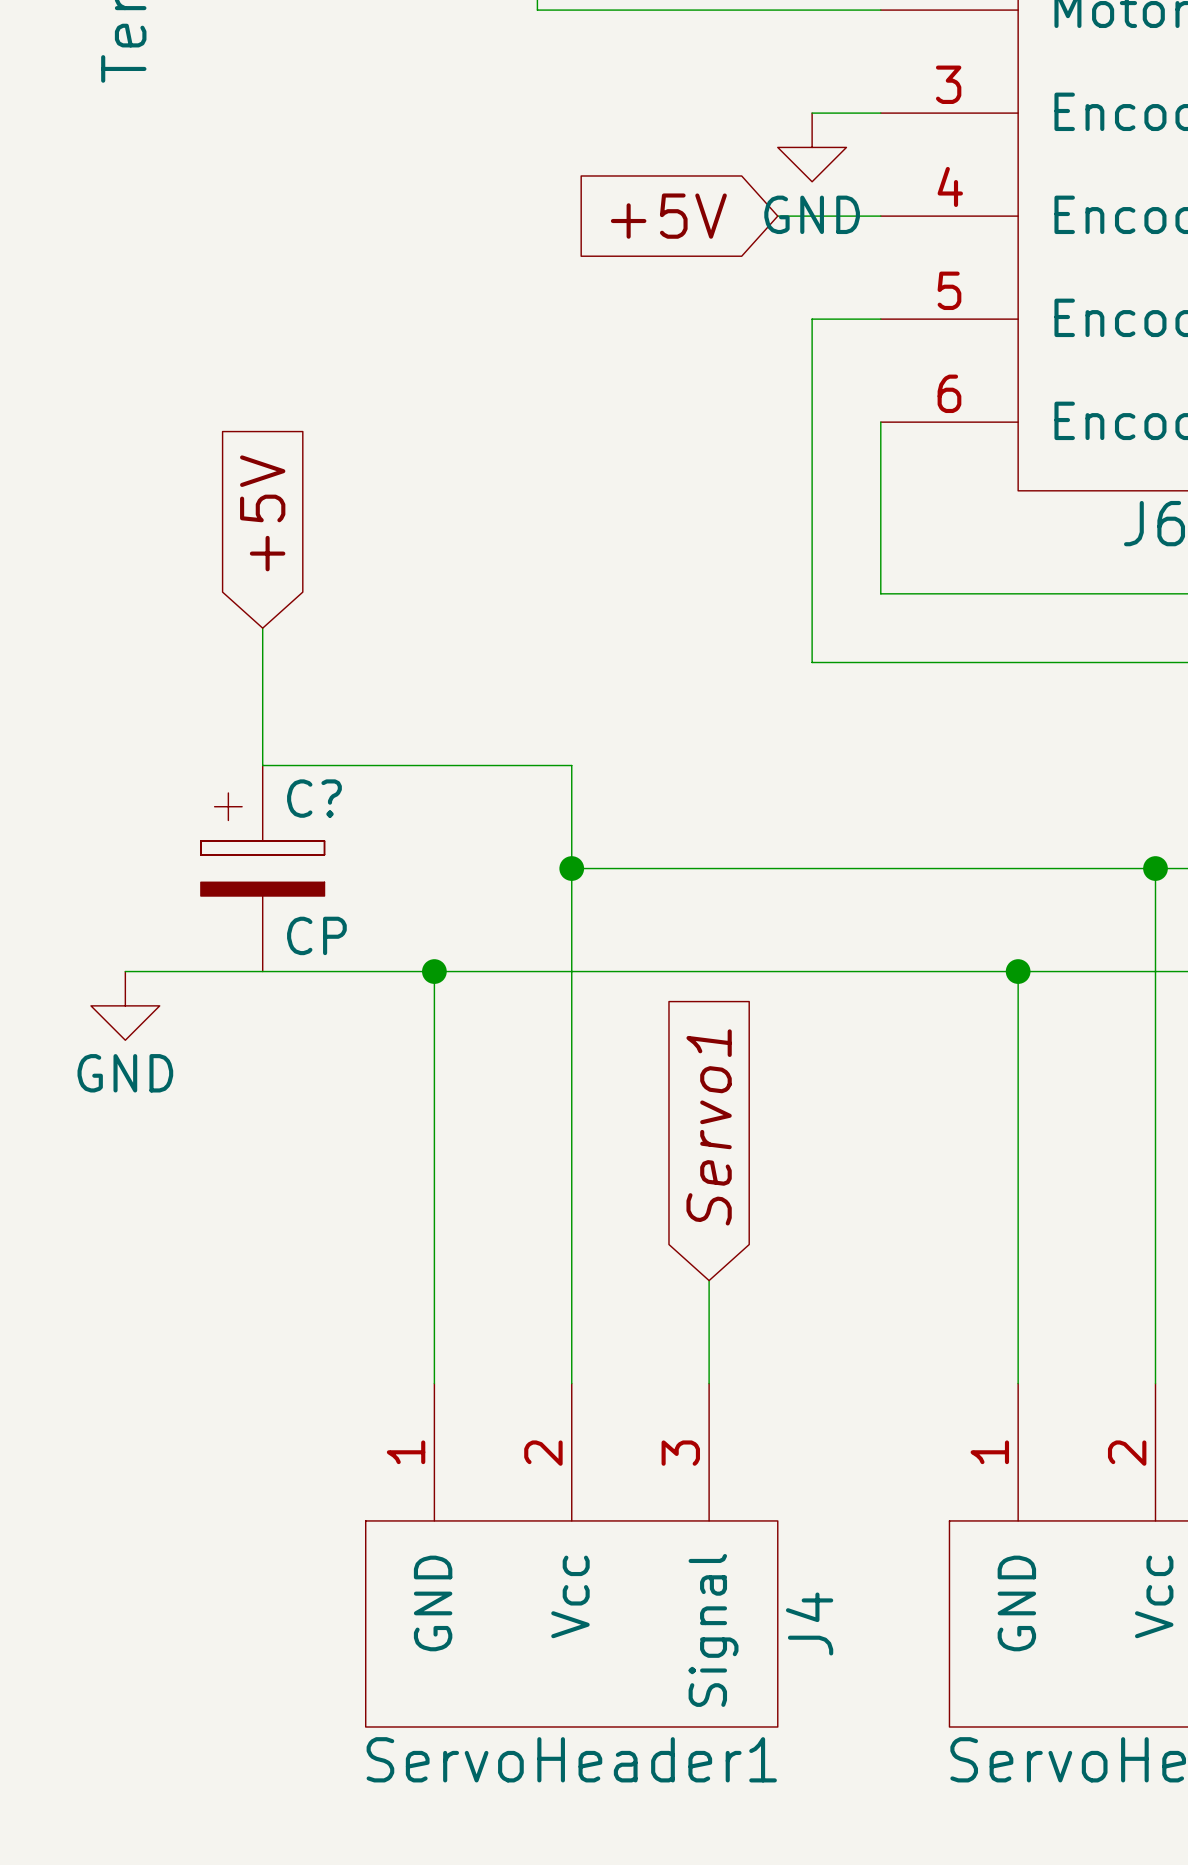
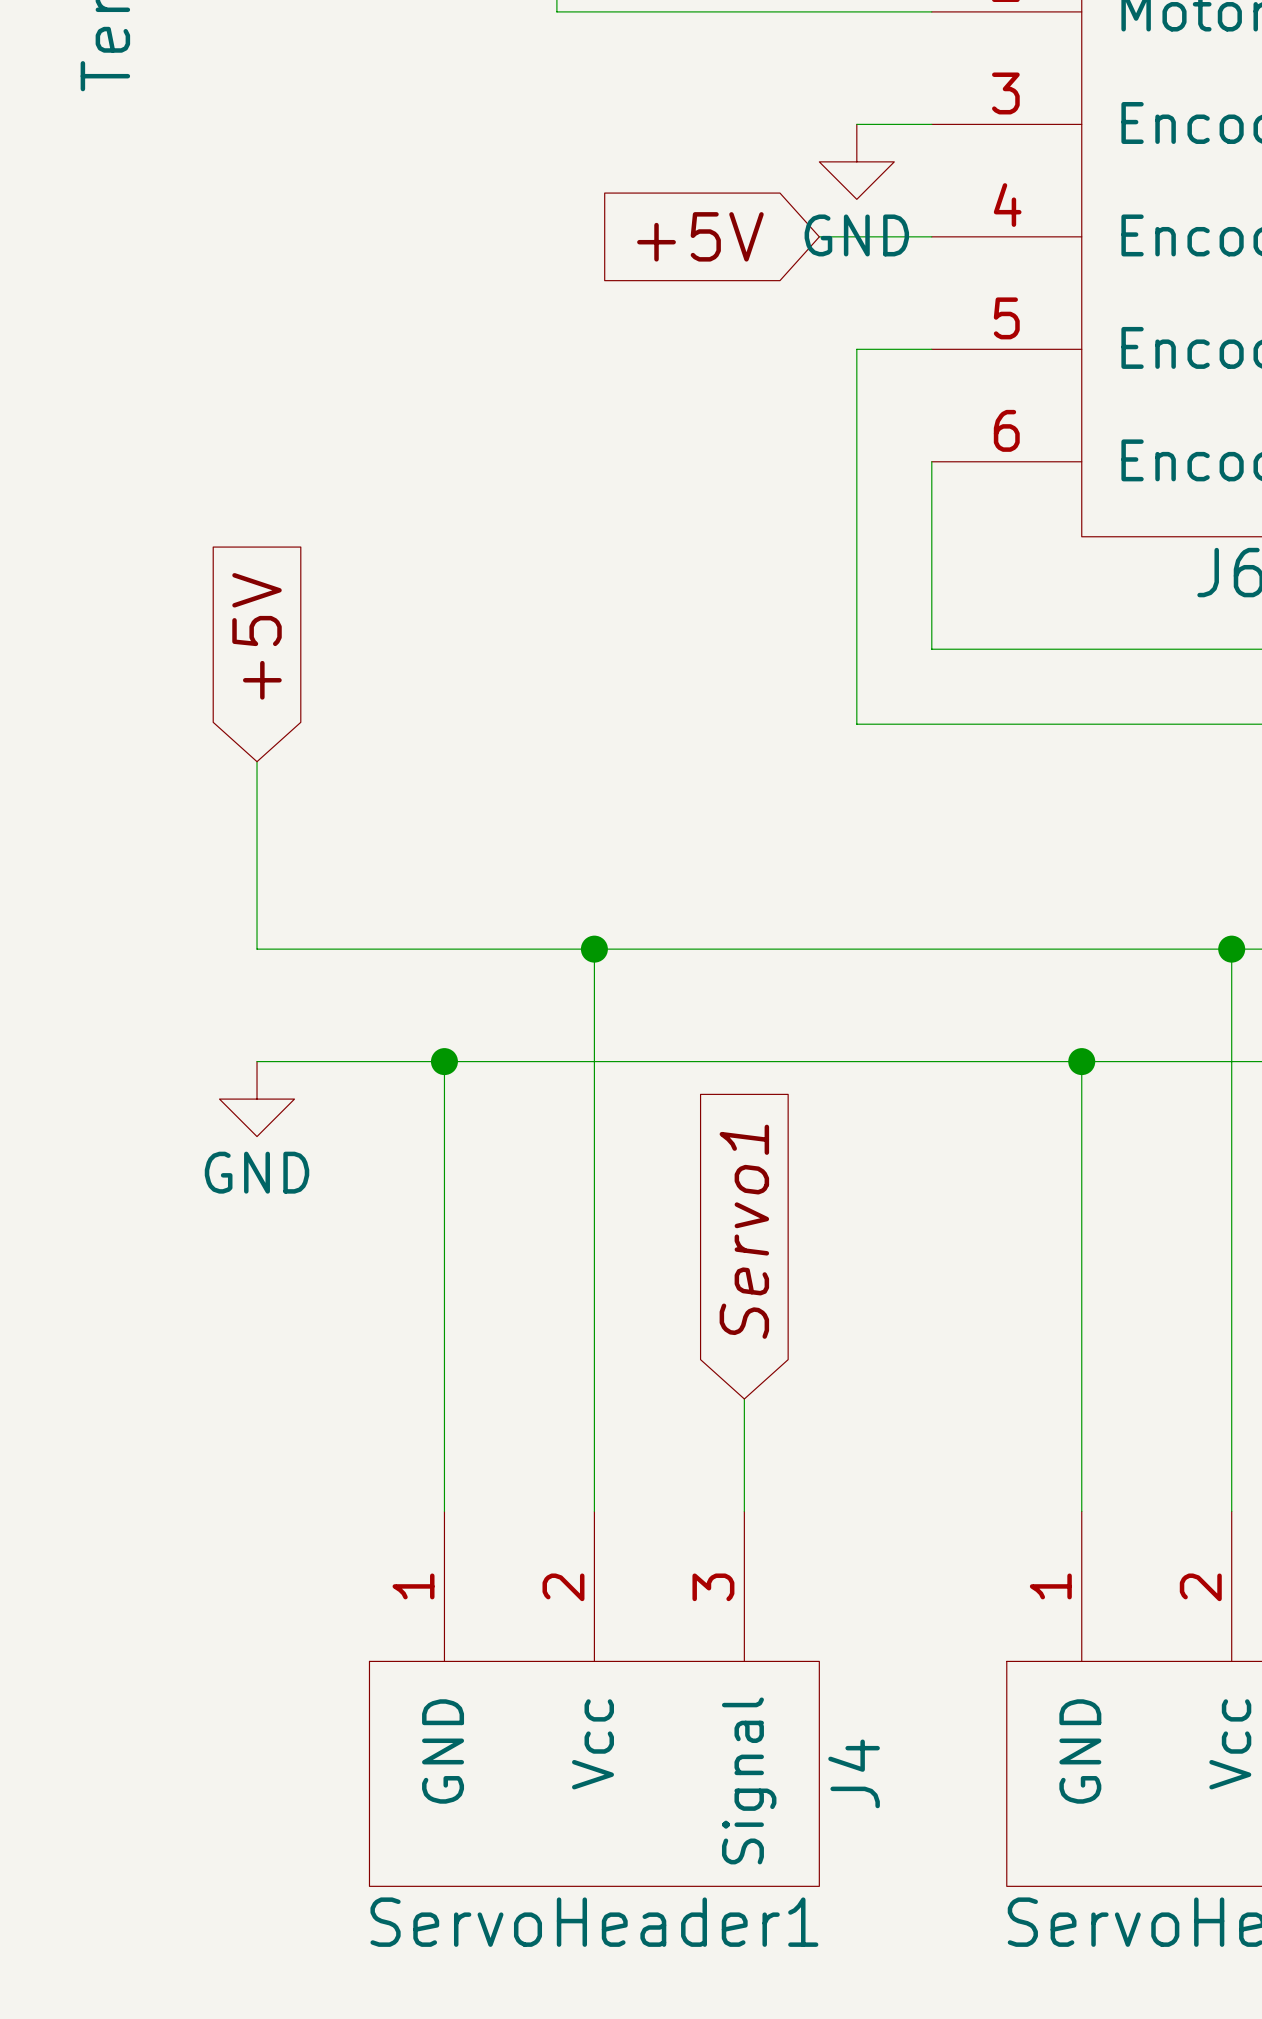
global label position: +5V (262, 513) -> +5V (257, 636)
wire: (262, 628) (262, 696) -> none
wire: (262, 765) (571, 765) (571, 868) -> (257, 836) (257, 949) (594, 949)
C?: CP (262, 868) -> none
wire: (125, 971) (262, 971) -> none
power symbol position: GND (125, 1005) -> GND (257, 1099)

